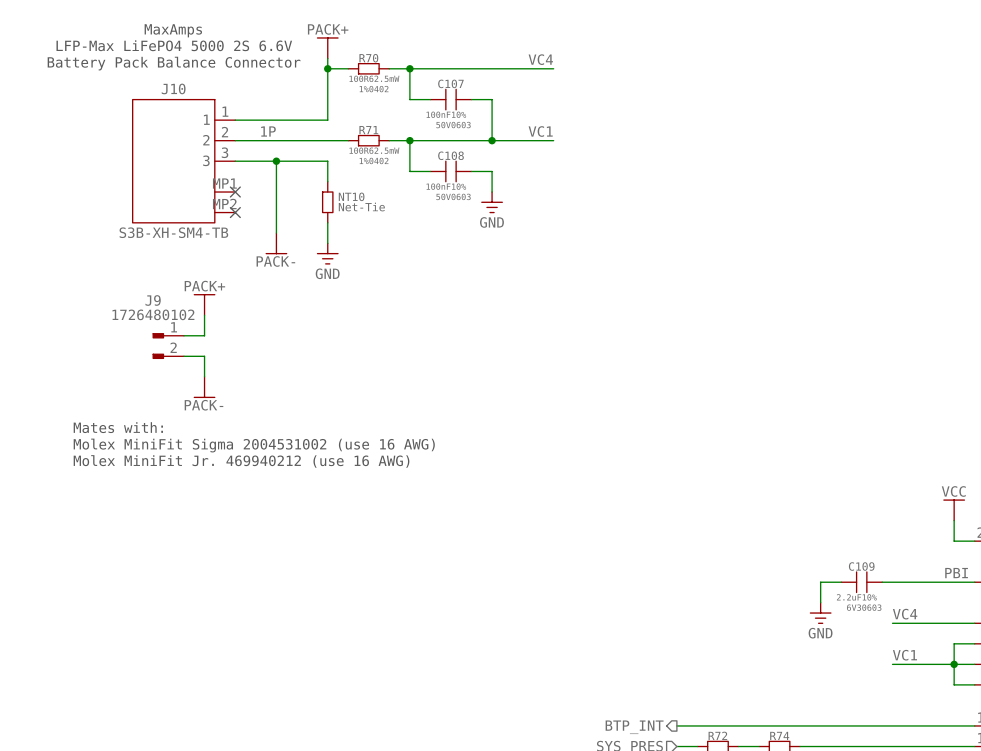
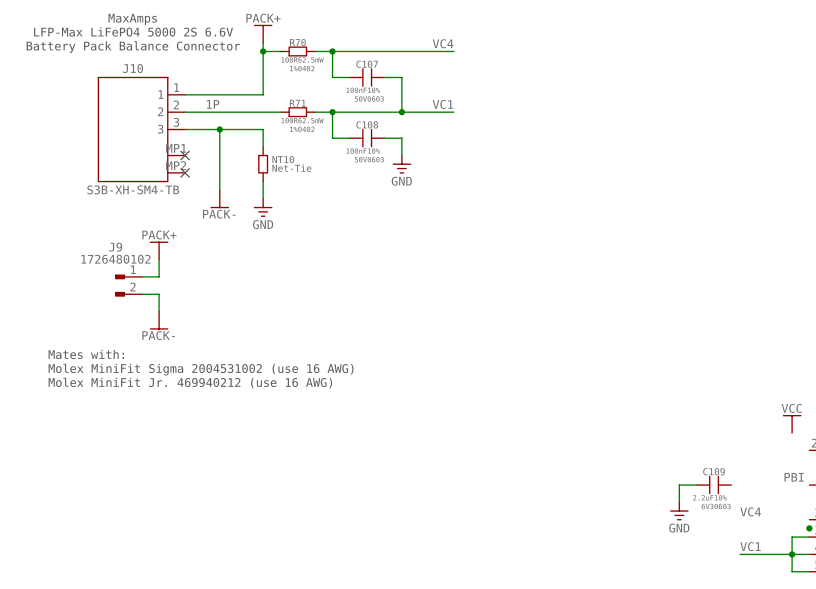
wire: (954, 520) (954, 541) (974, 541) -> none
wire: (882, 582) (974, 582) -> none
wire: (892, 623) (974, 623) -> none
junction: none -> (809, 528)

